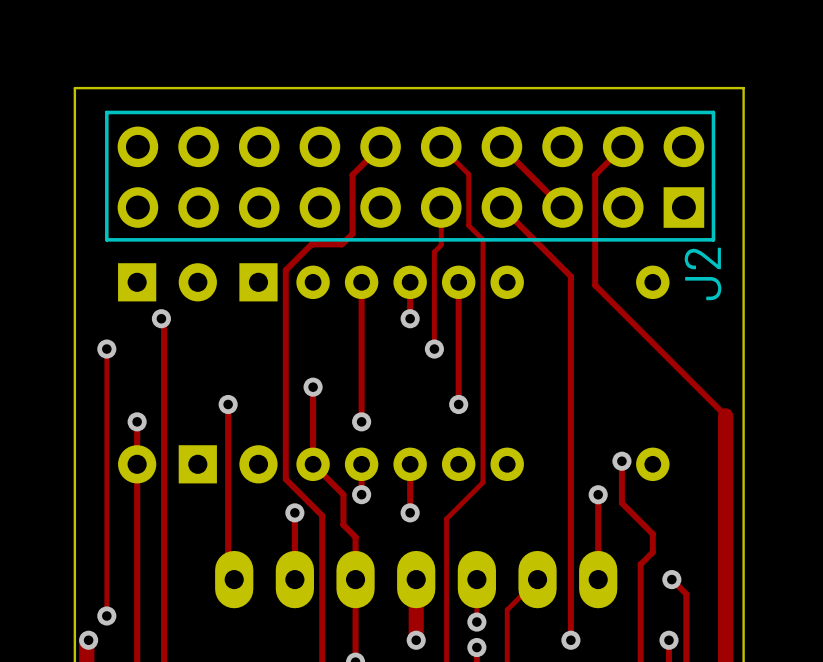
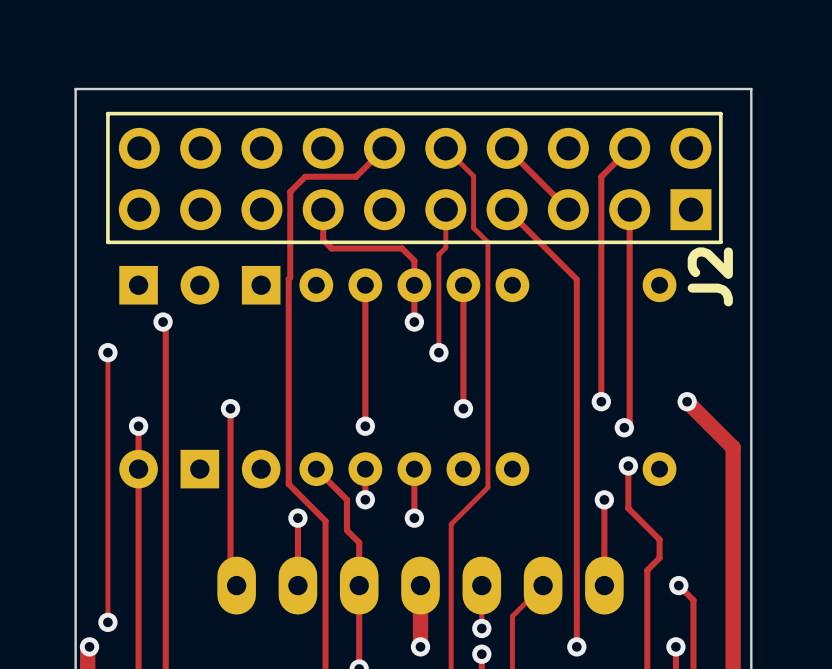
track: (352, 174) (352, 233) (341, 244) (311, 244) (285, 270) (285, 276) -> (356, 176) (305, 176) (290, 191) (290, 277) (288, 279)
track: none -> (323, 209) (323, 240) (331, 248) (402, 248) (414, 260) (414, 285)
track: none -> (629, 209) (629, 422) (624, 427)
track: (595, 285) (725, 415) (725, 443) -> (601, 288) (601, 401)
track: (313, 387) (313, 464) -> none
via: (313, 387) -> none
via: none -> (601, 401)
track: none -> (687, 401) (733, 447)
via: none -> (687, 401)
via: none -> (624, 427)

